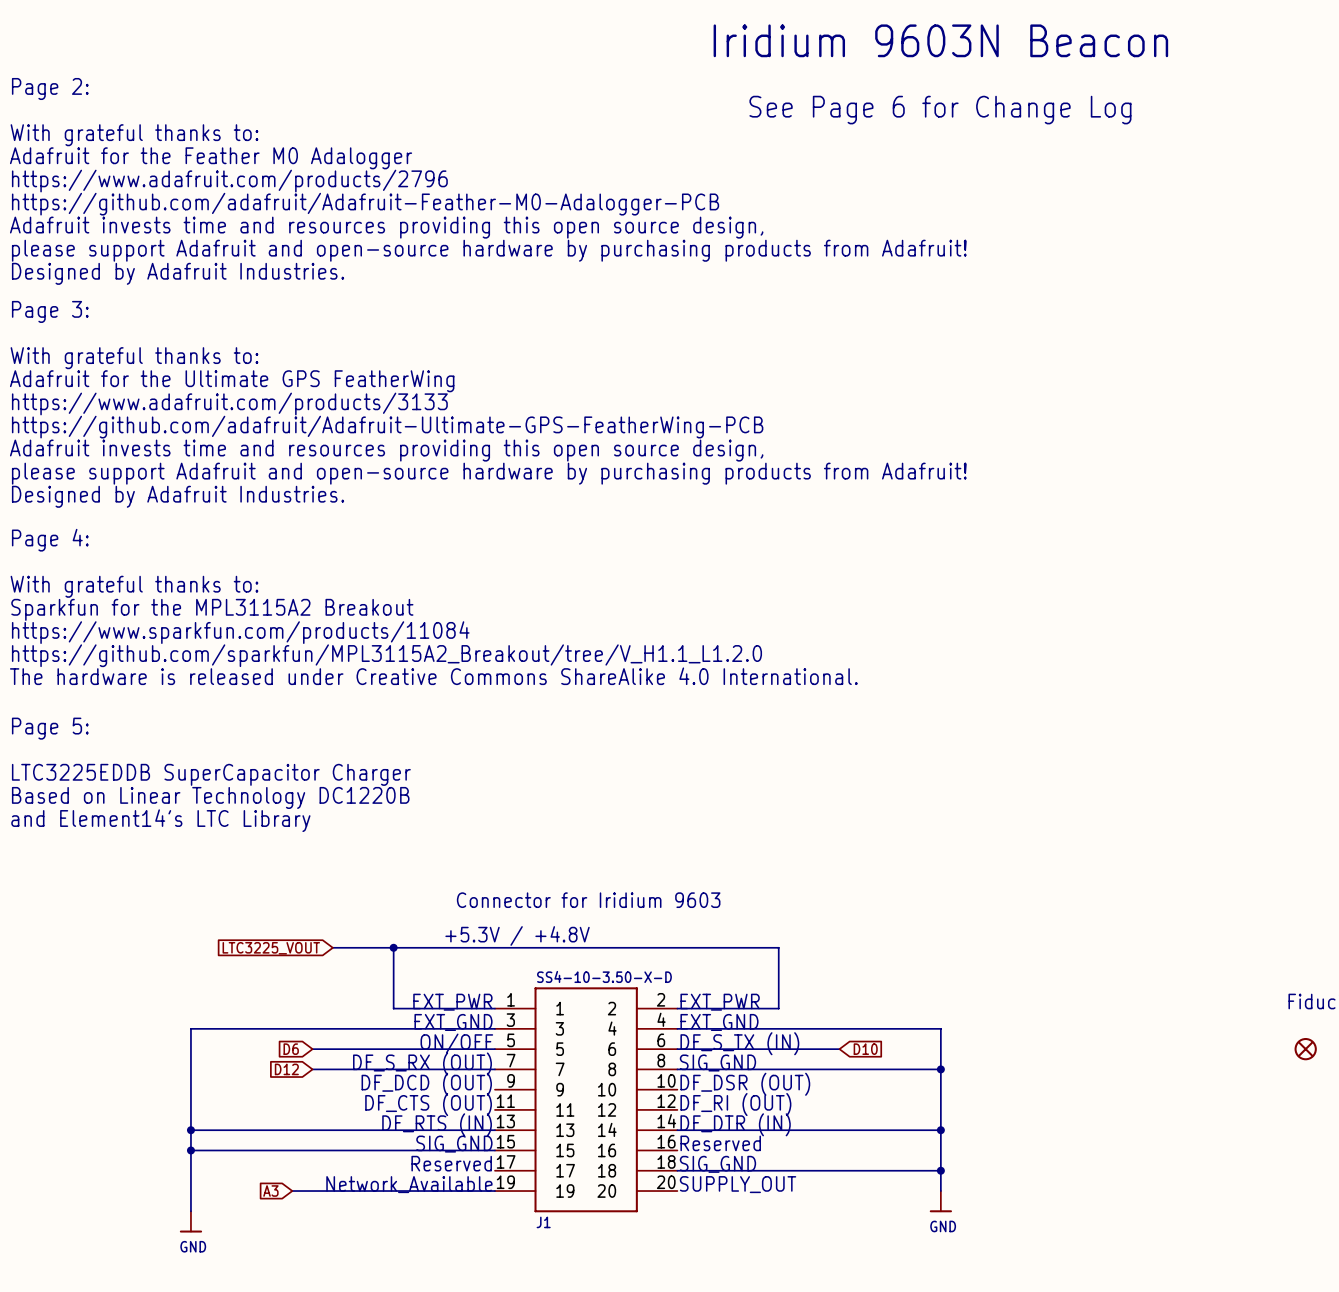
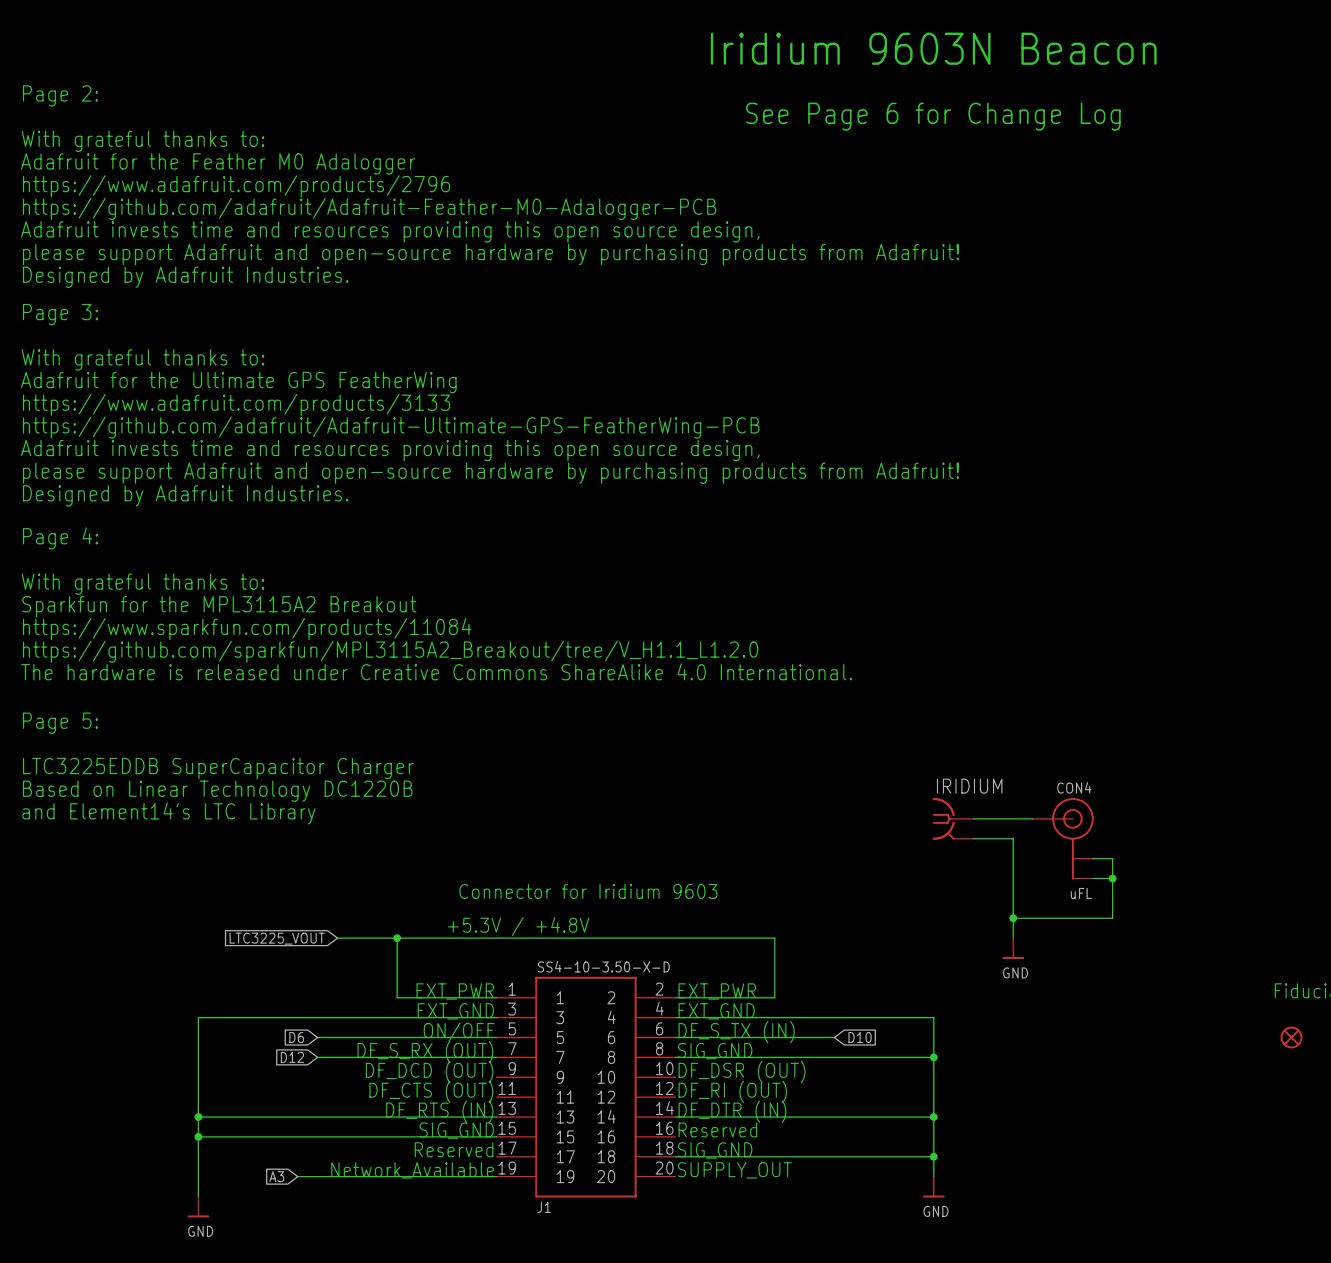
IRIDIUM: none -> (953, 818)
wire: none -> (973, 818) (1033, 818)
wire: none -> (973, 838) (1013, 838) (1013, 938)
CON4: none -> uFL (1063, 838)
wire: none -> (1092, 858) (1112, 858) (1112, 918) (1013, 918)
wire: none -> (1092, 878) (1112, 878)
junction: none -> (1112, 878)
junction: none -> (1013, 918)
power symbol: none -> GND (1013, 948)

